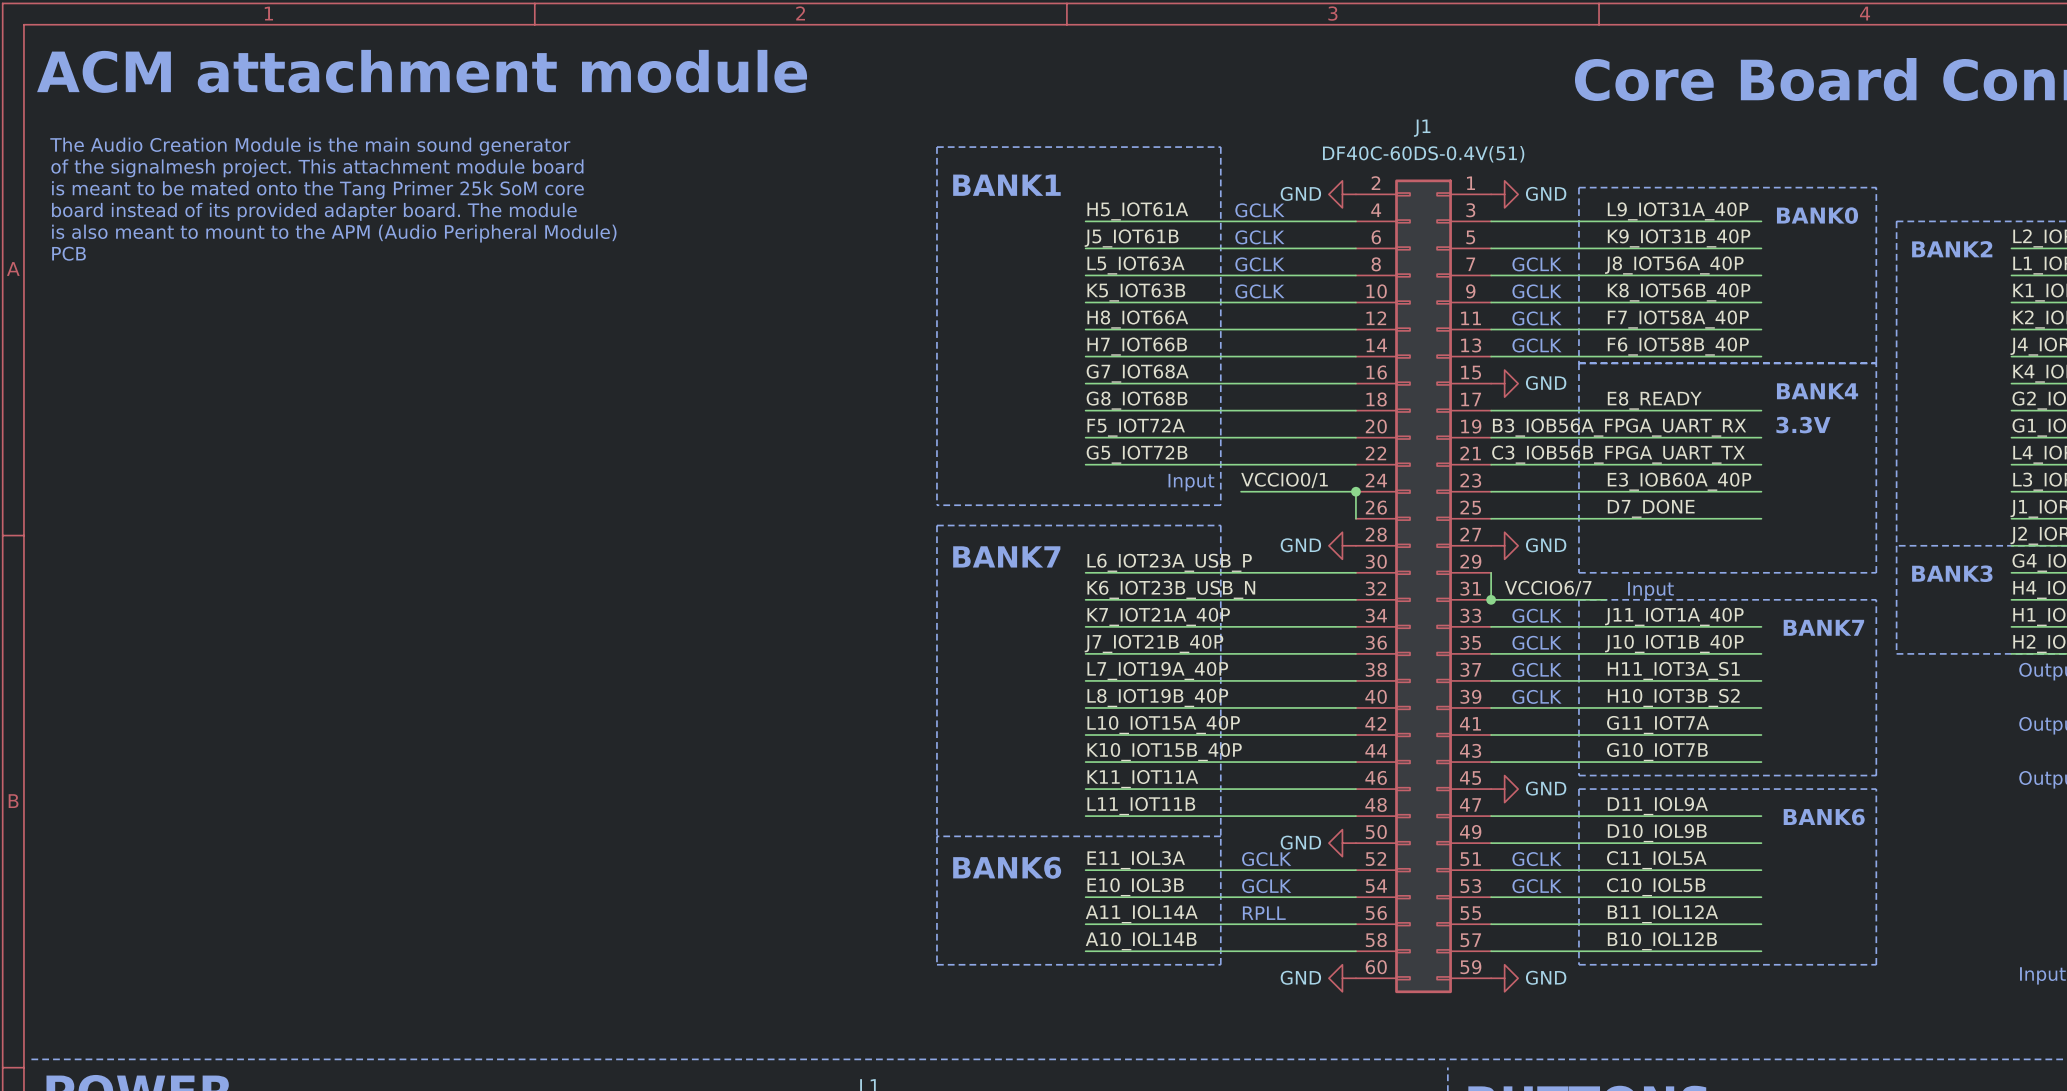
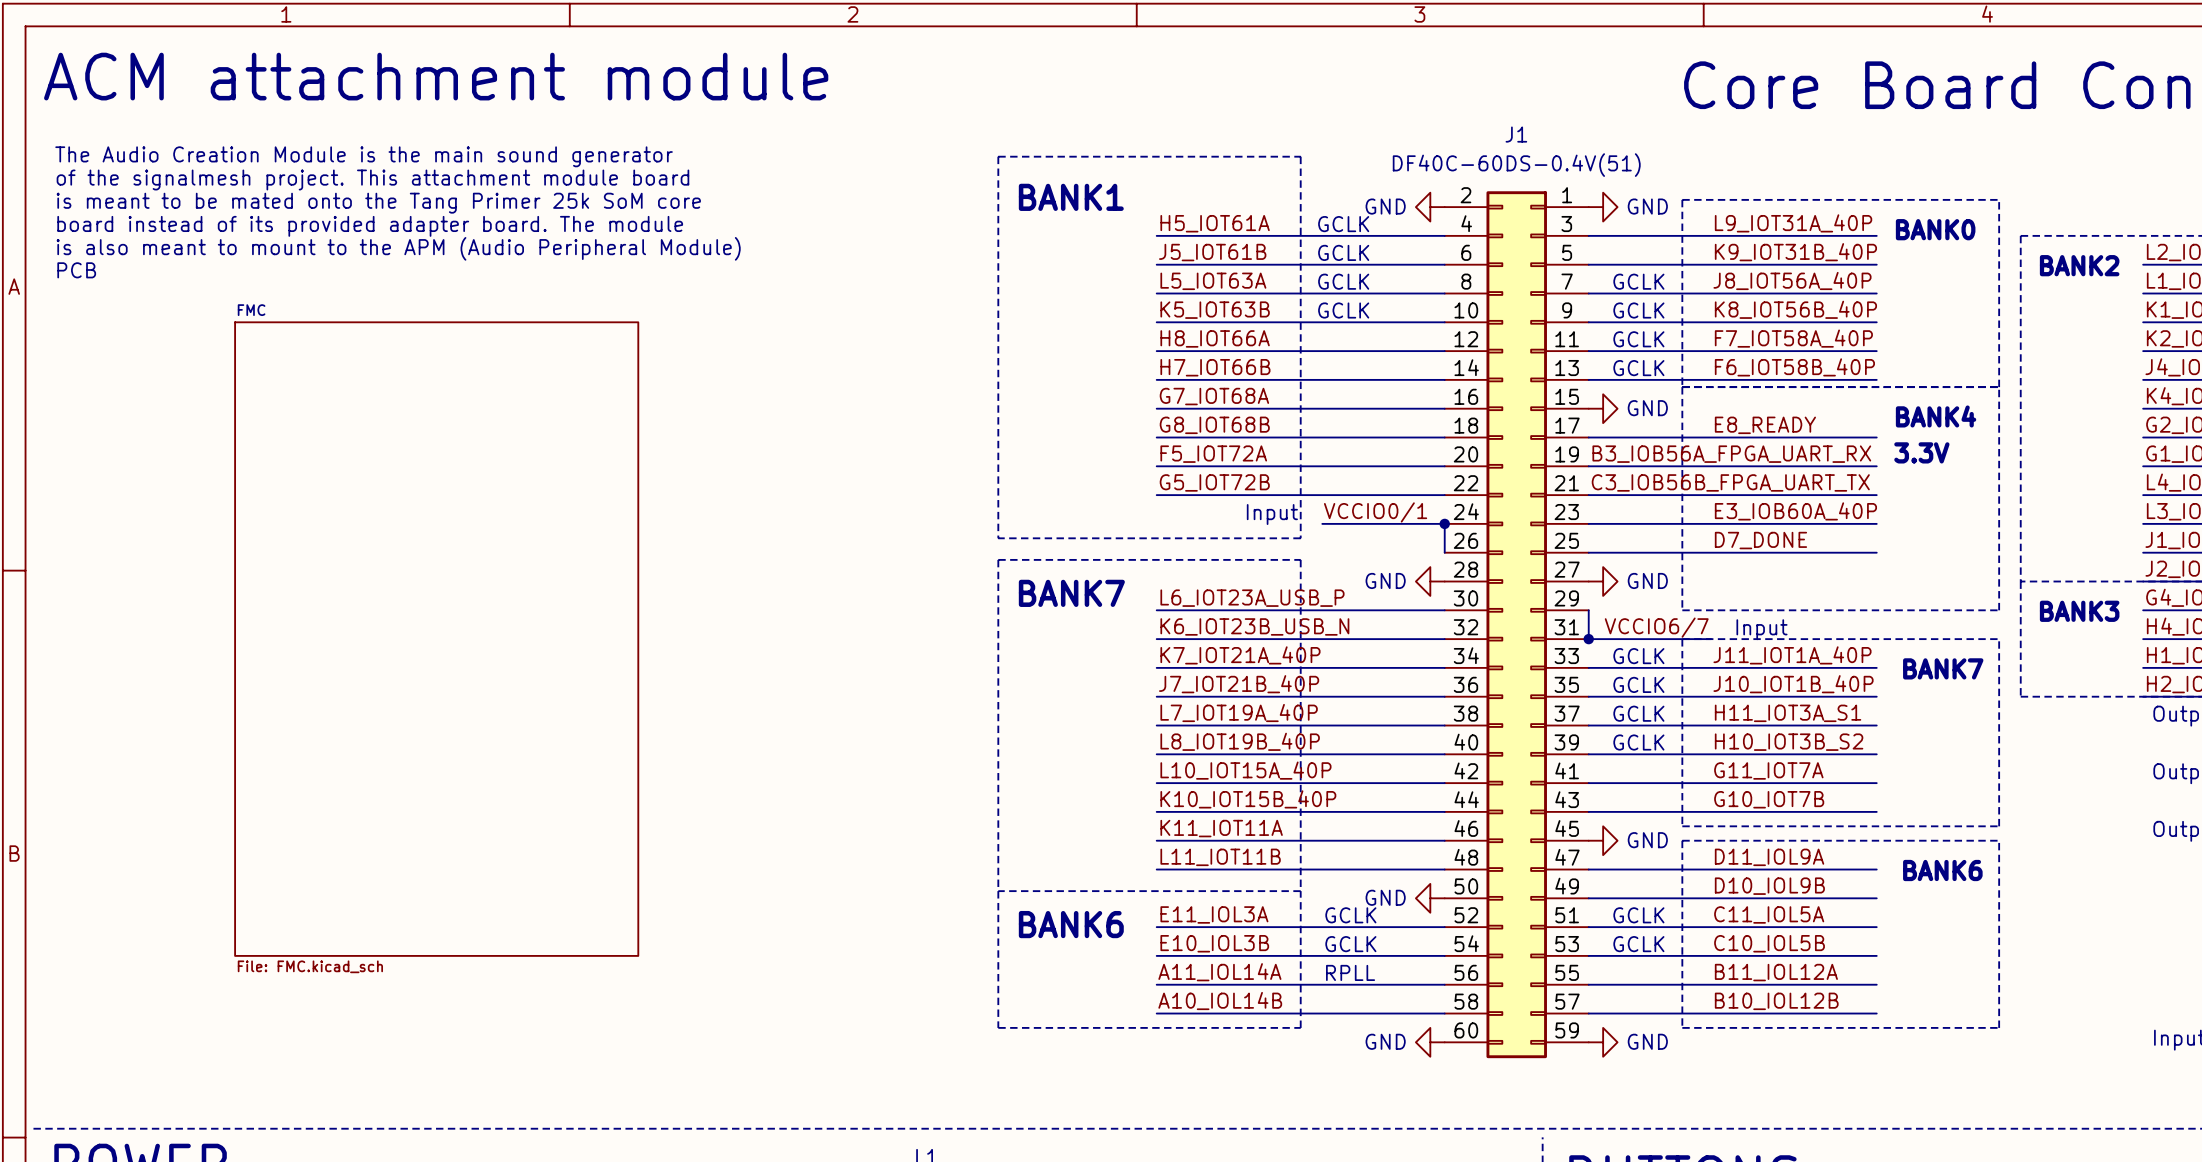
sheet FMC: none -> File: FMC.kicad_sch (436, 639)

